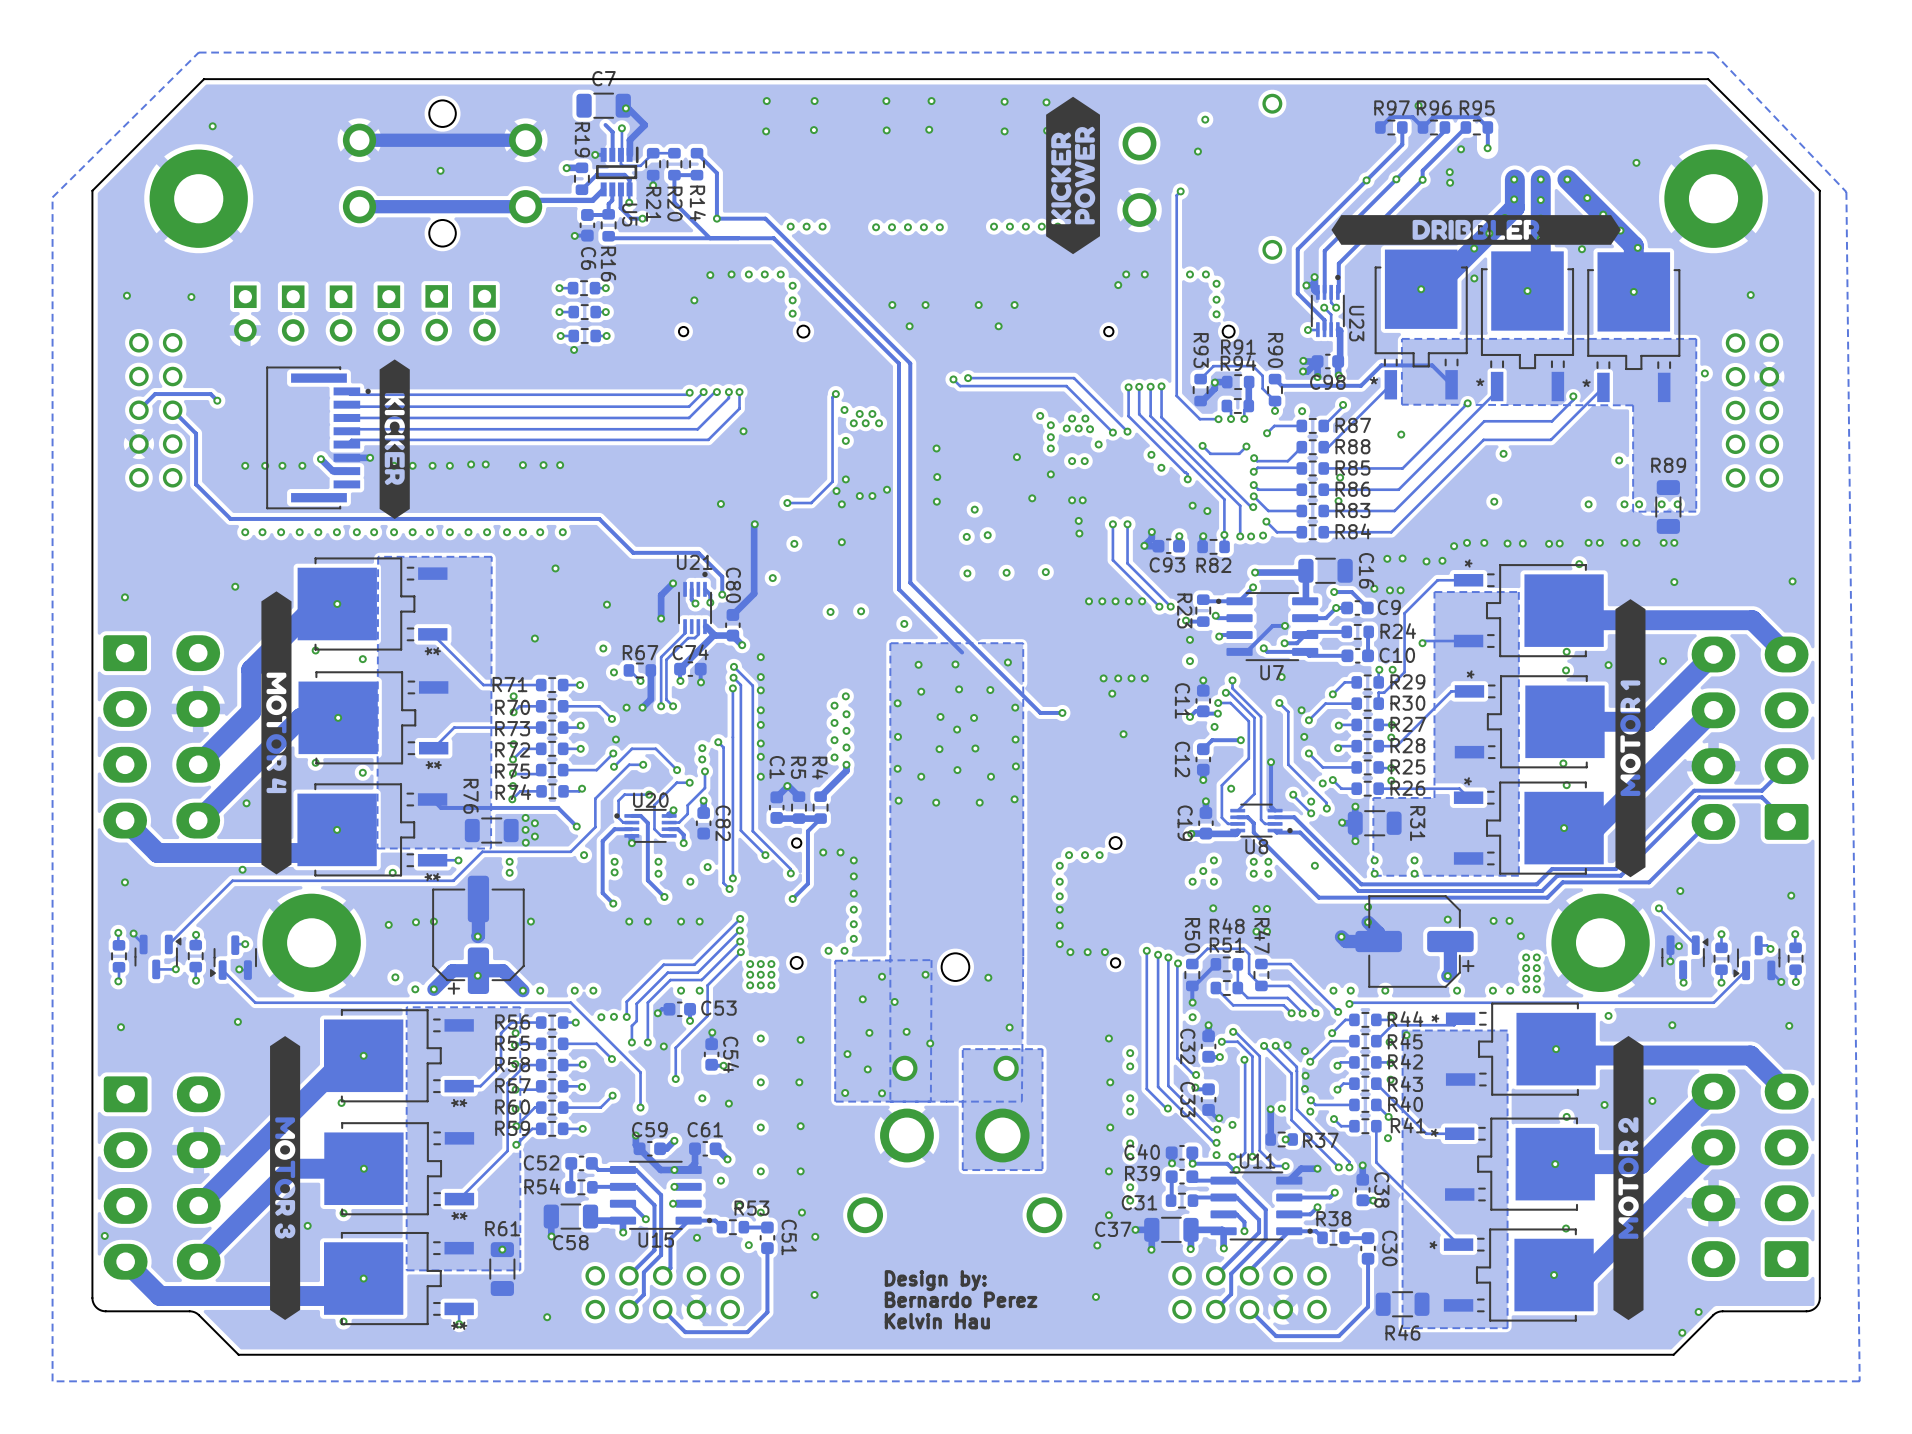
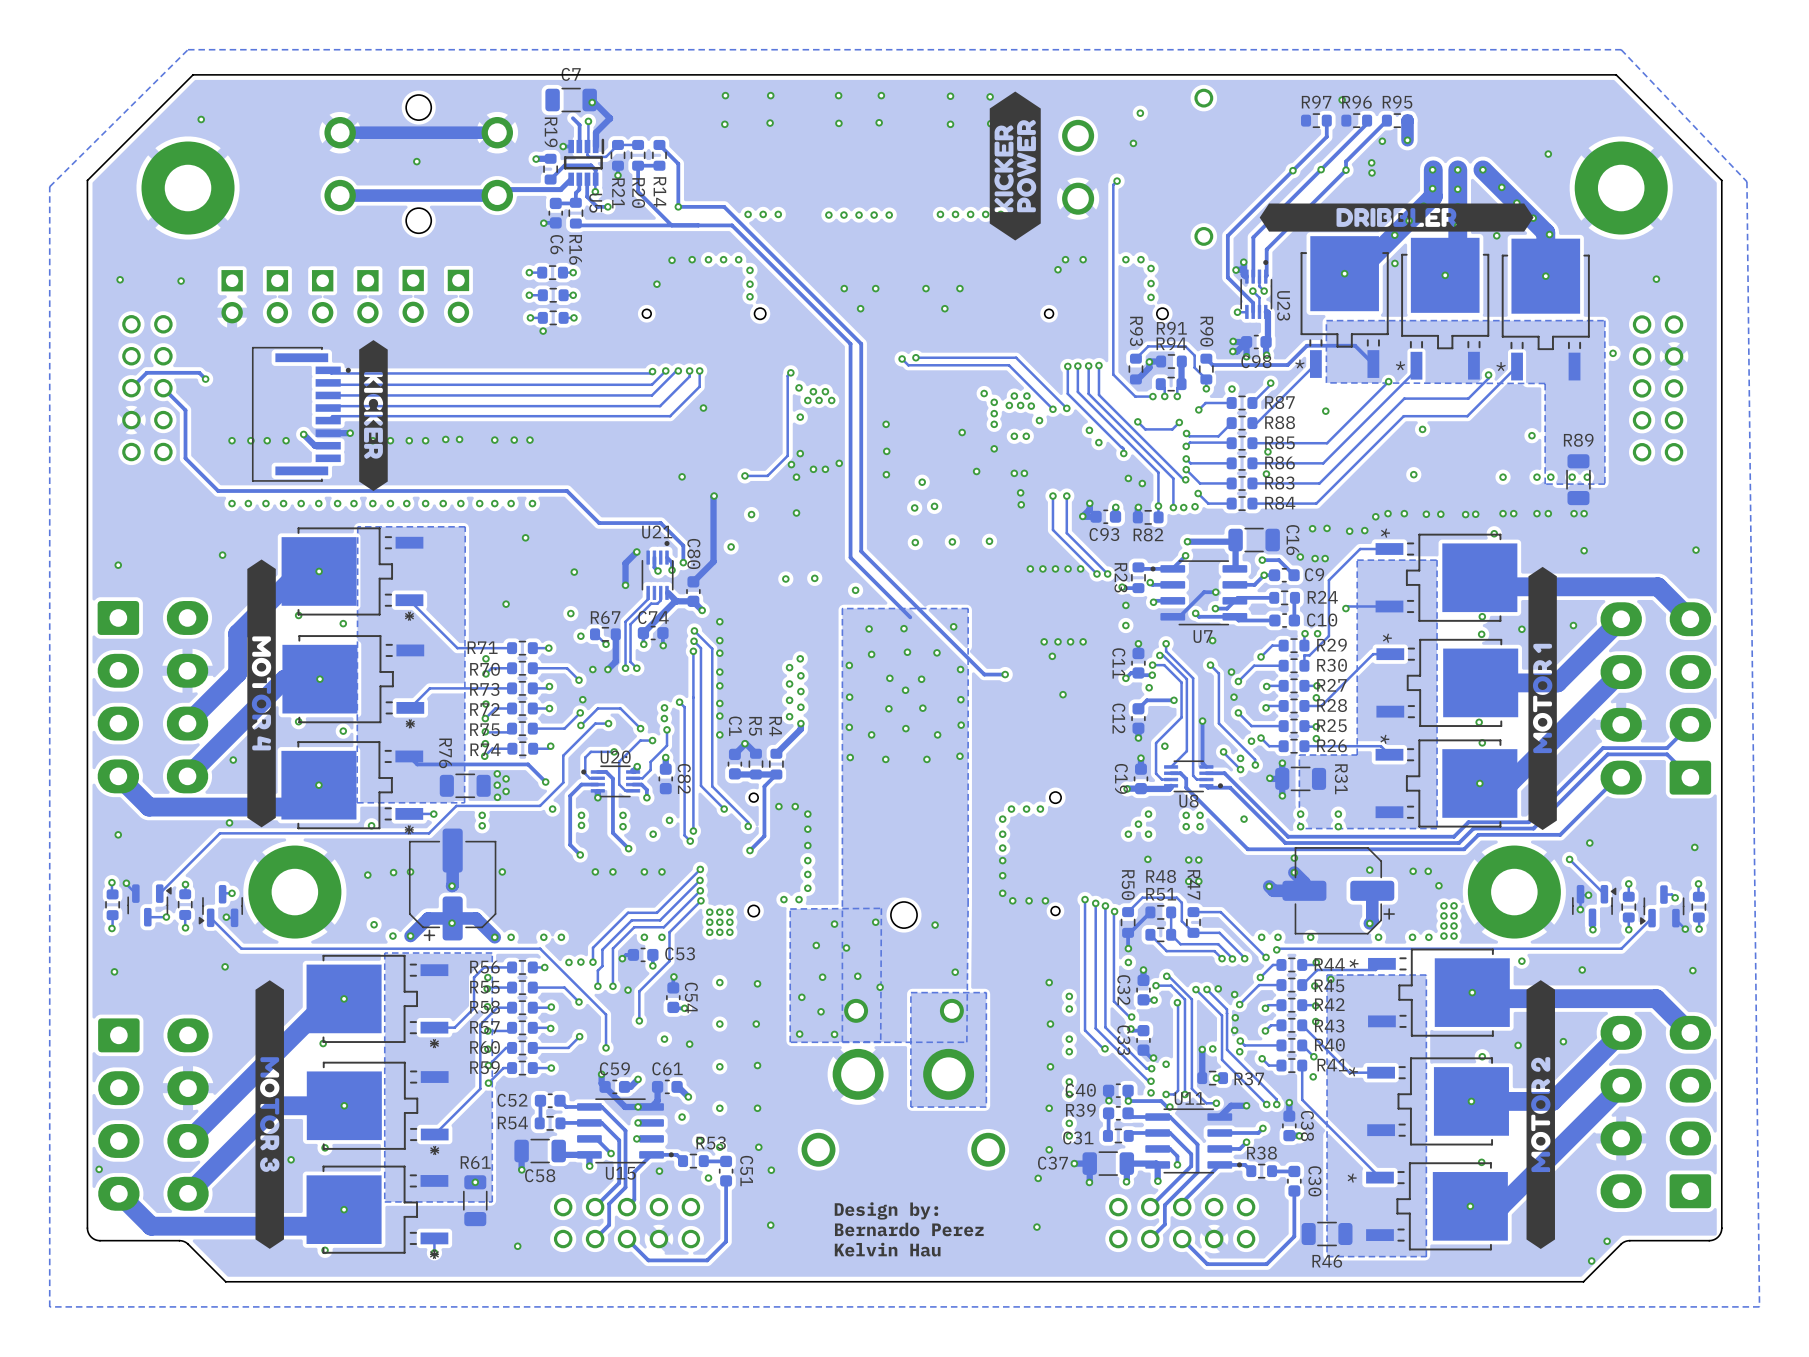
track: (1380, 127) (1390, 117) (1412, 117) (1422, 127) (1433, 117) (1477, 117) (1487, 127) (1487, 148) -> (1407, 120) (1407, 140)

